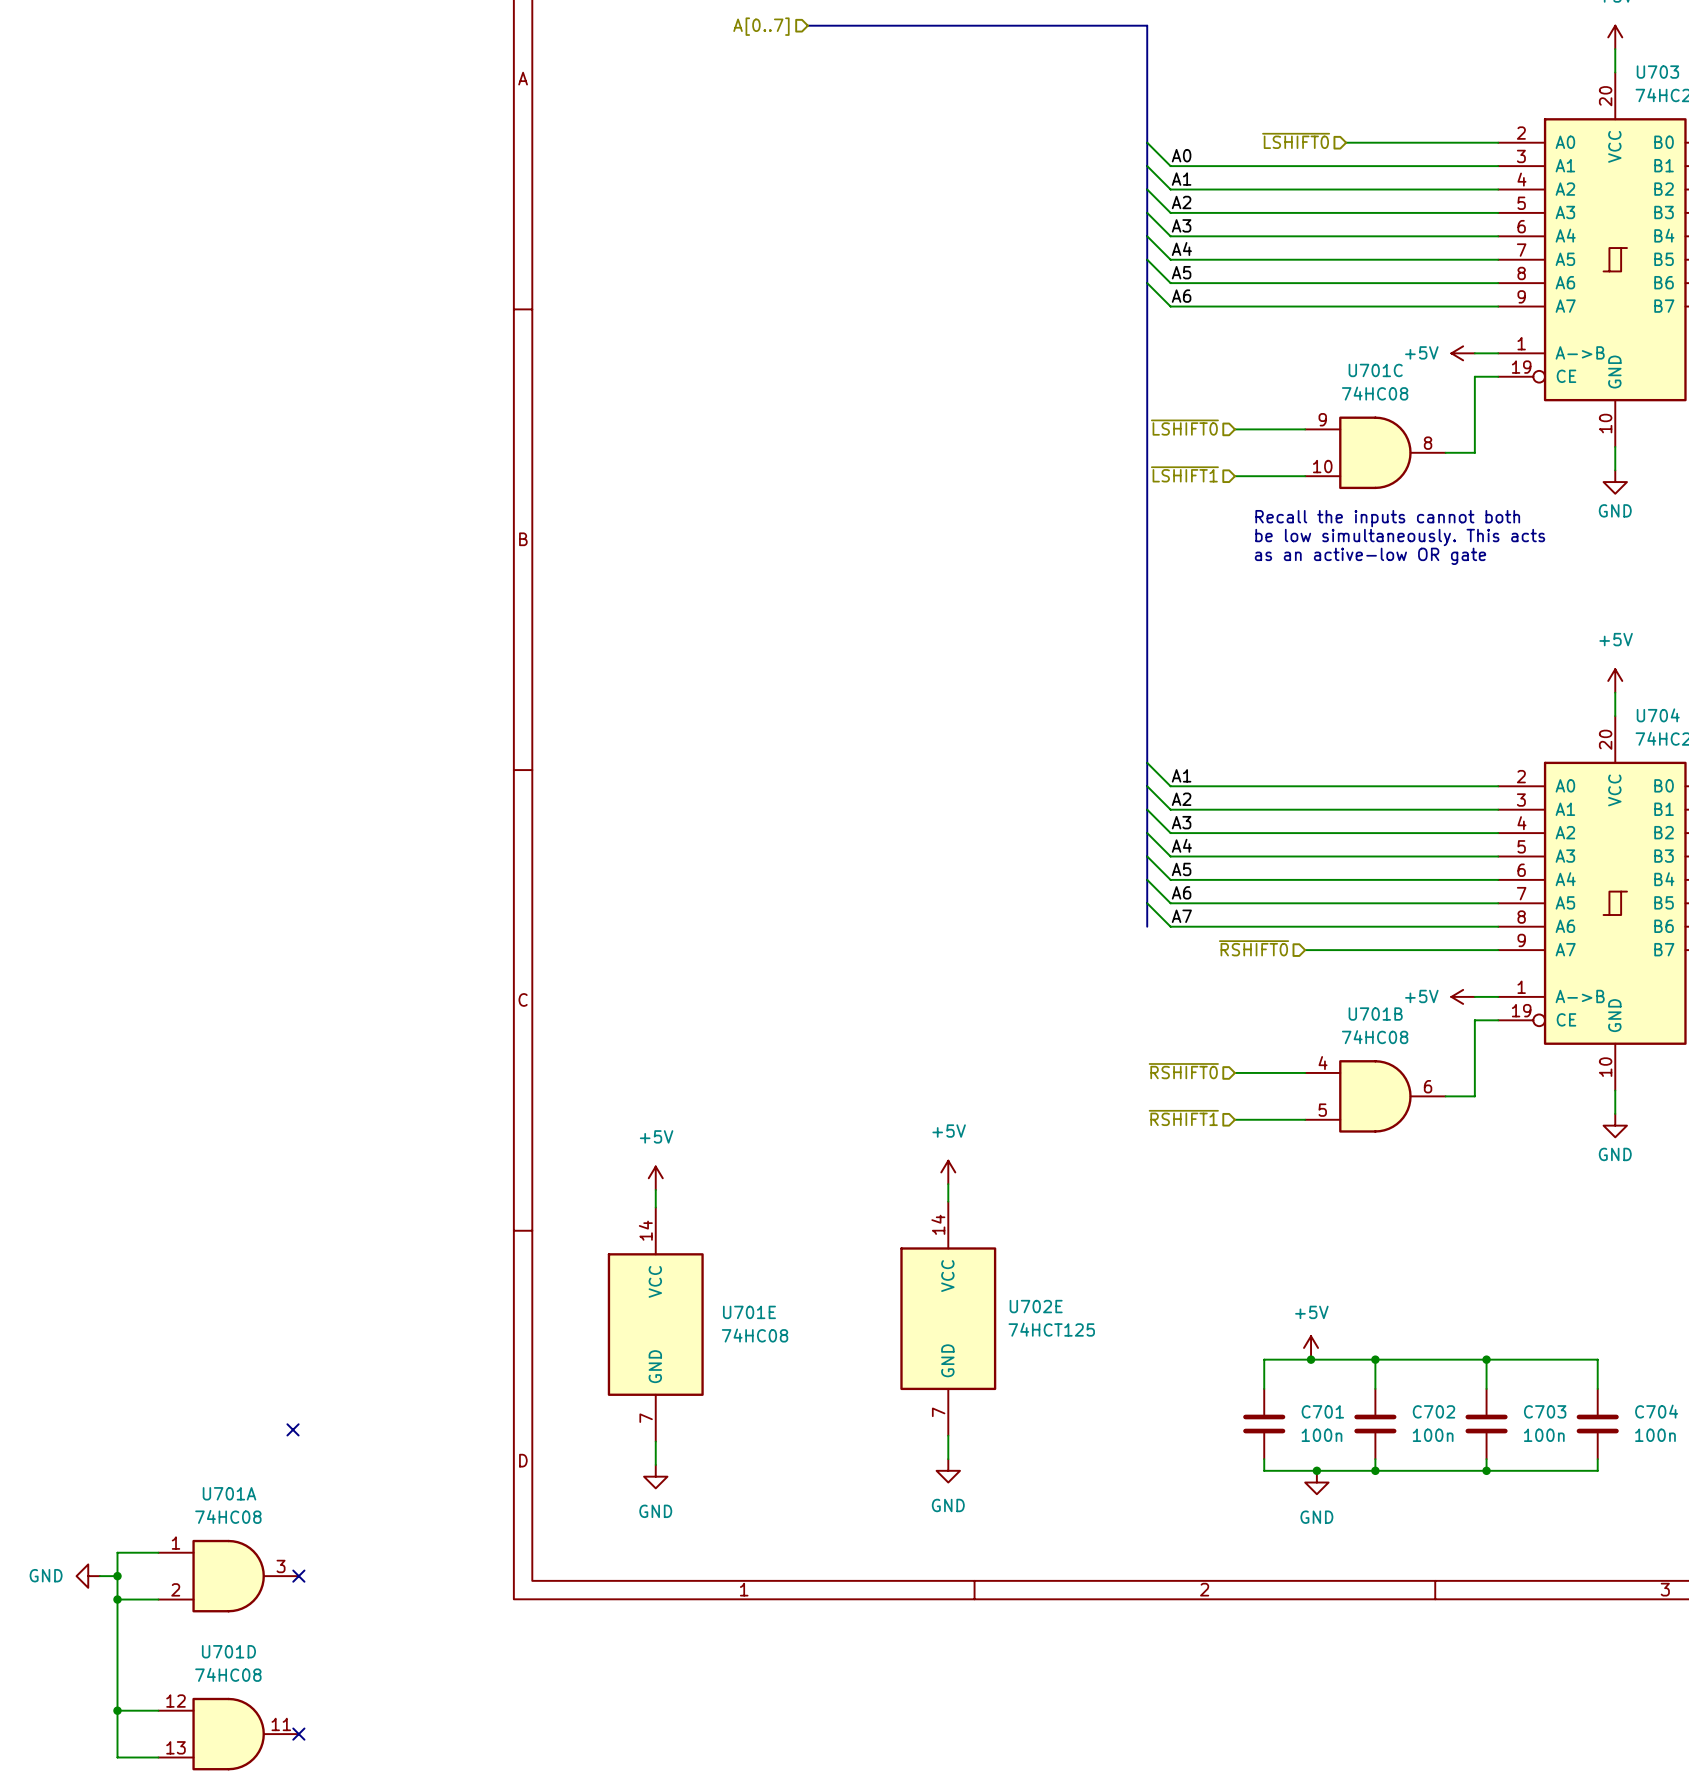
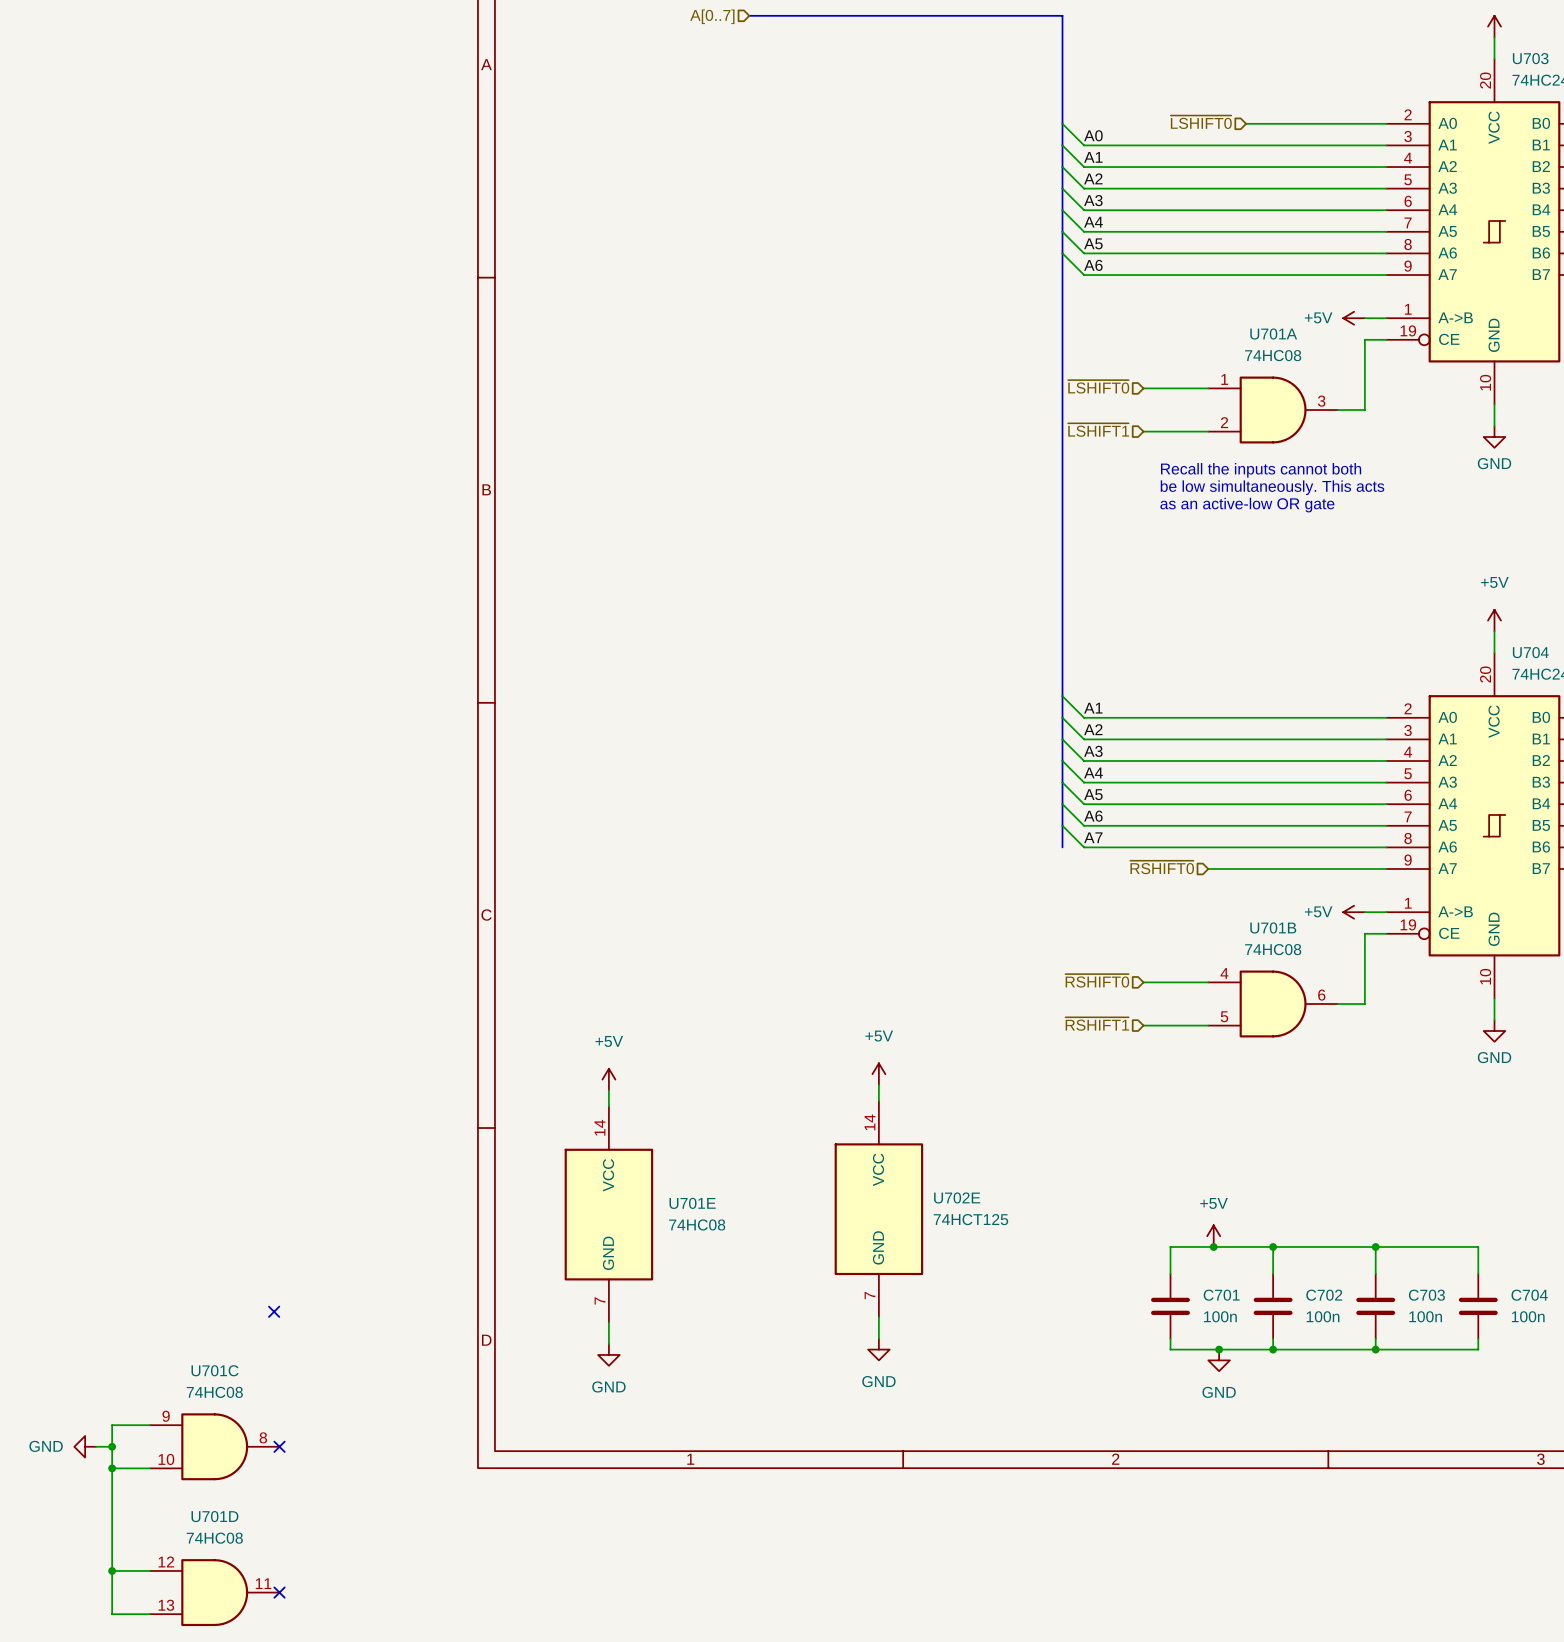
U701C position: (1375, 452) -> (214, 1446)
U701A position: (228, 1576) -> (1273, 410)

